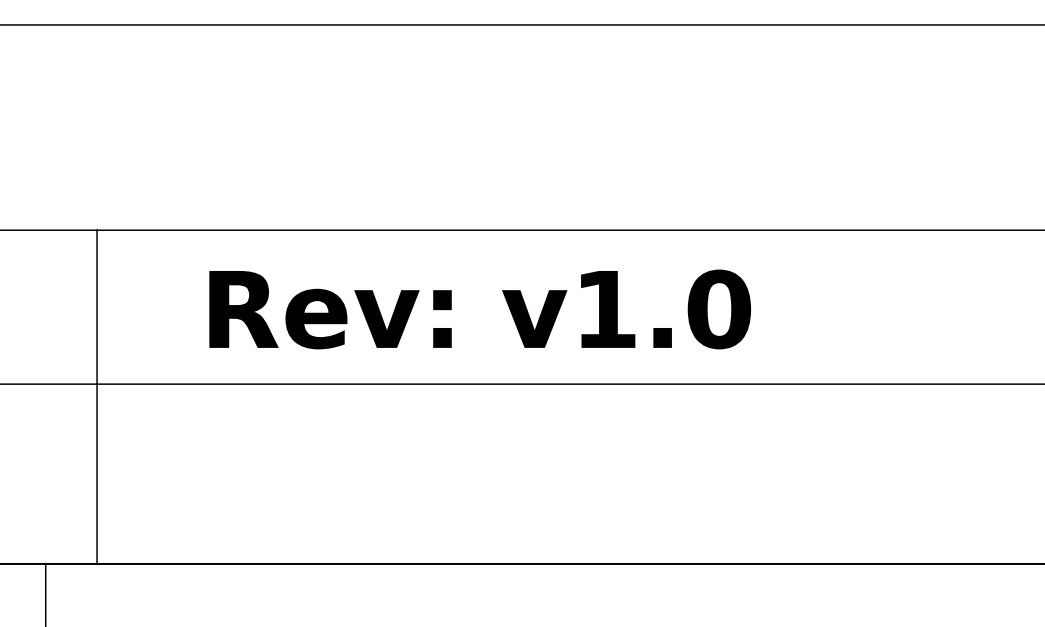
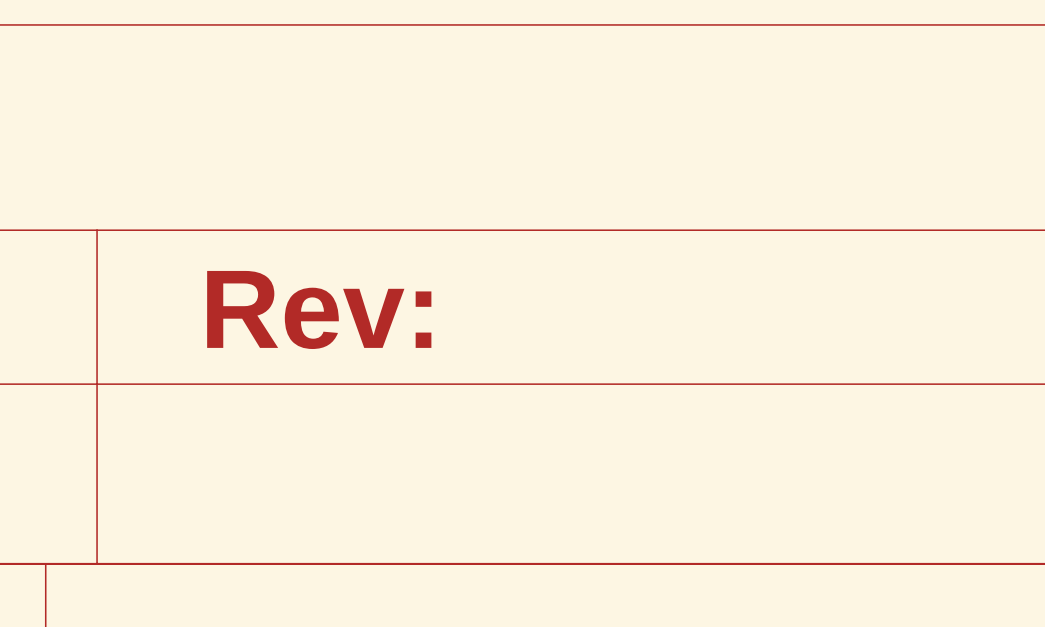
title block: Rev: v1.0 (480, 309) -> Rev: (319, 309)

